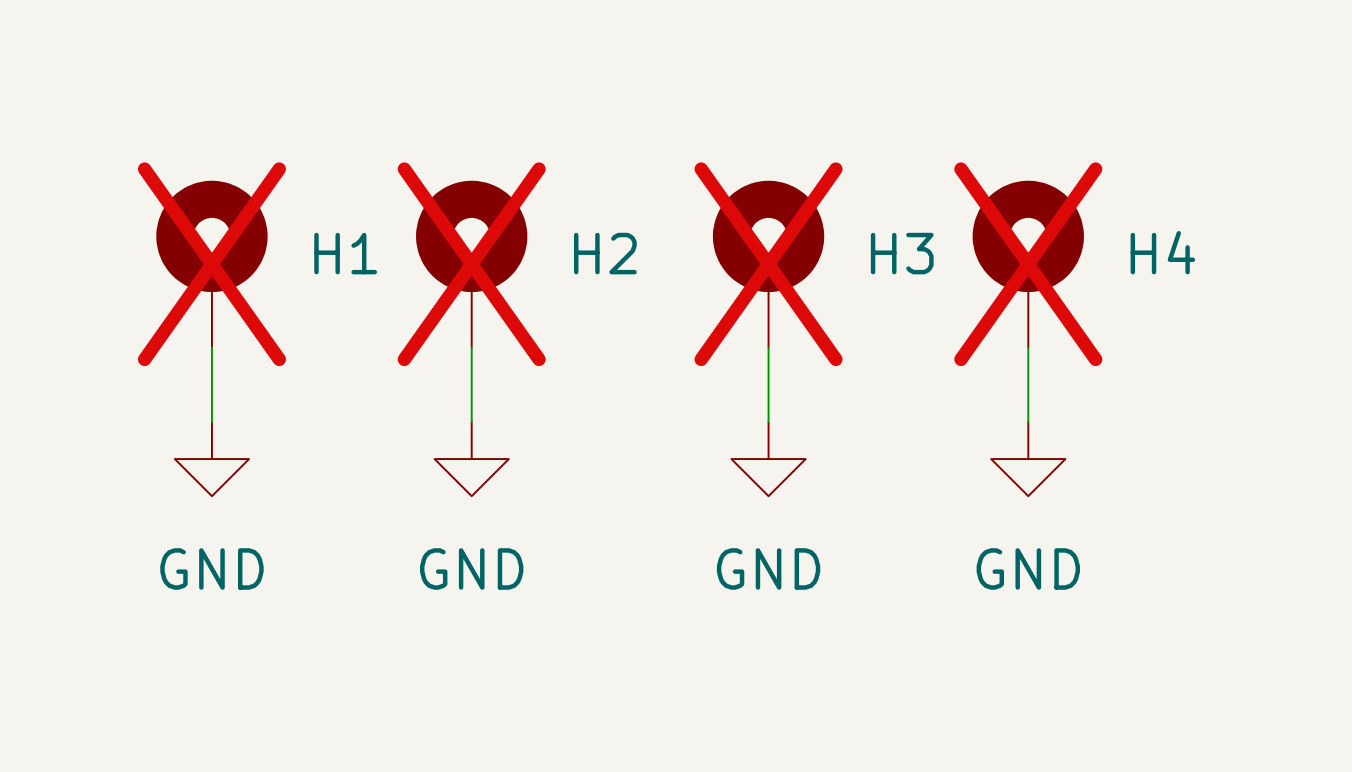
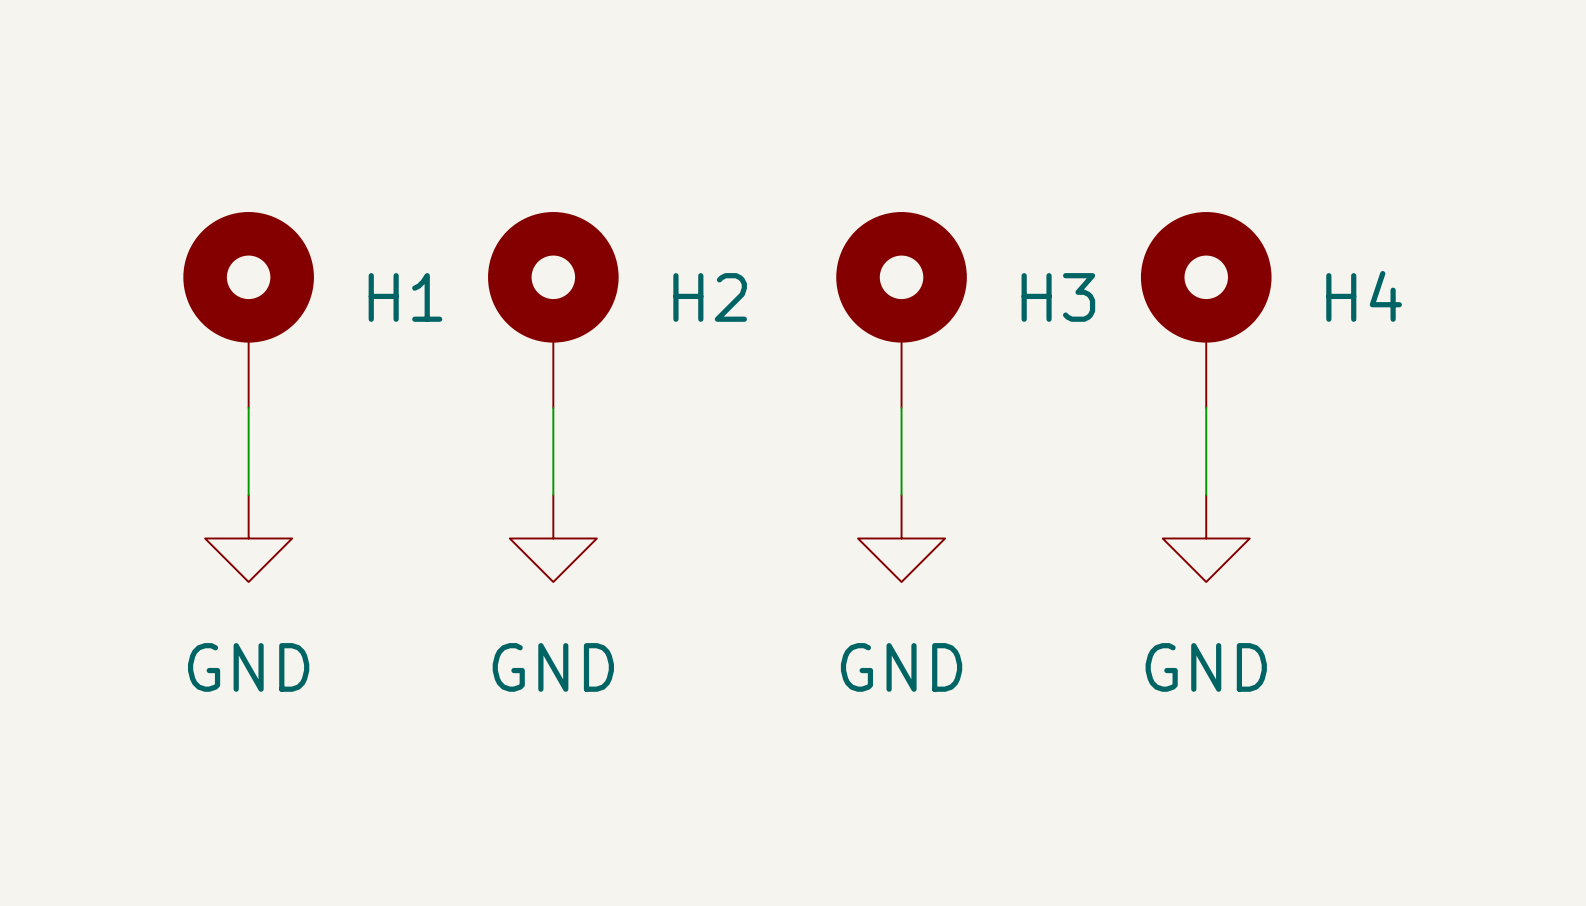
H1 do-not-place cross: (211, 264) -> none
H2 do-not-place cross: (471, 264) -> none
H3 do-not-place cross: (768, 264) -> none
H4 do-not-place cross: (1028, 264) -> none

